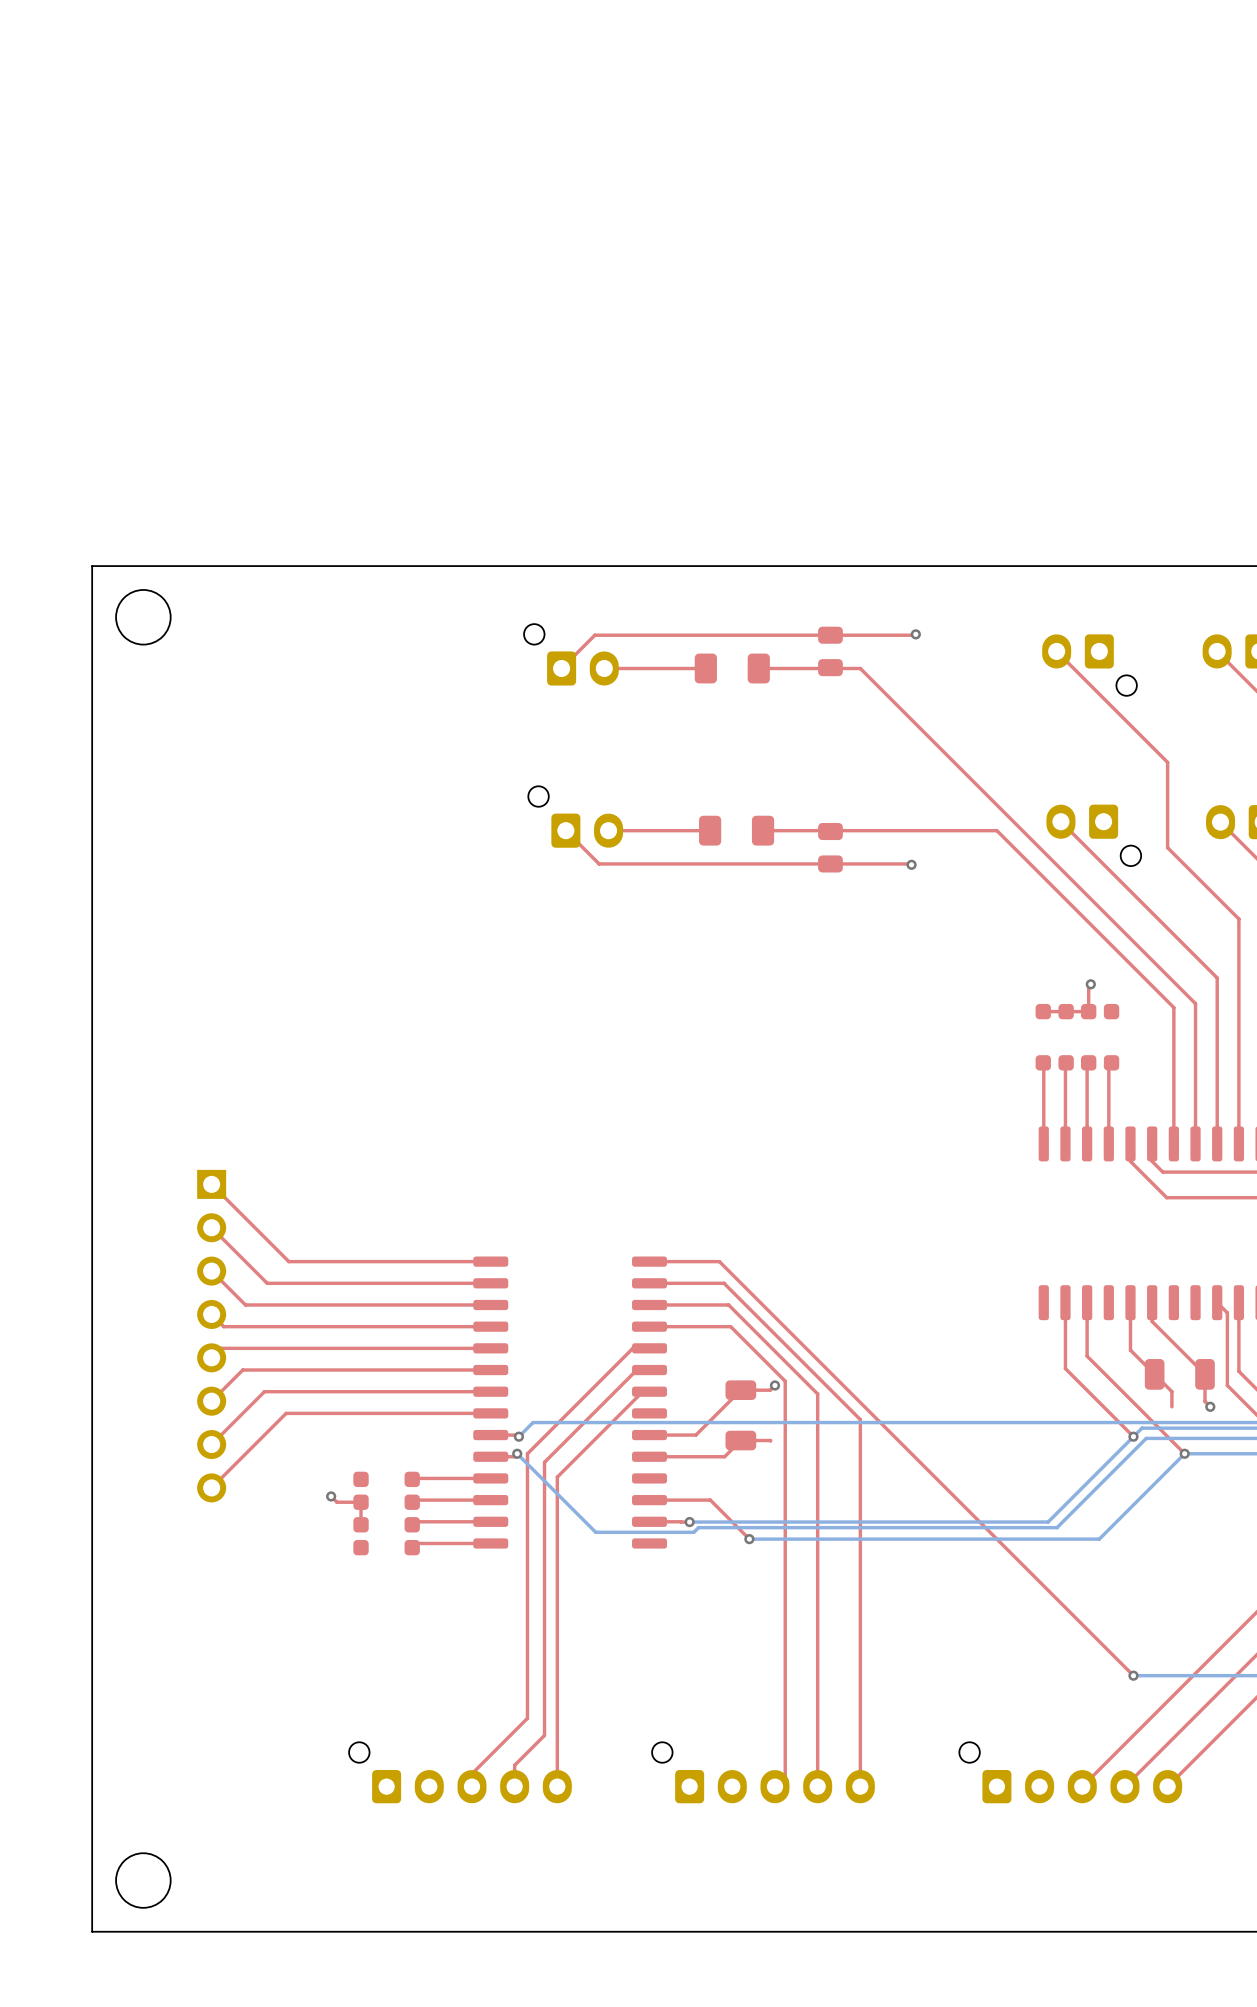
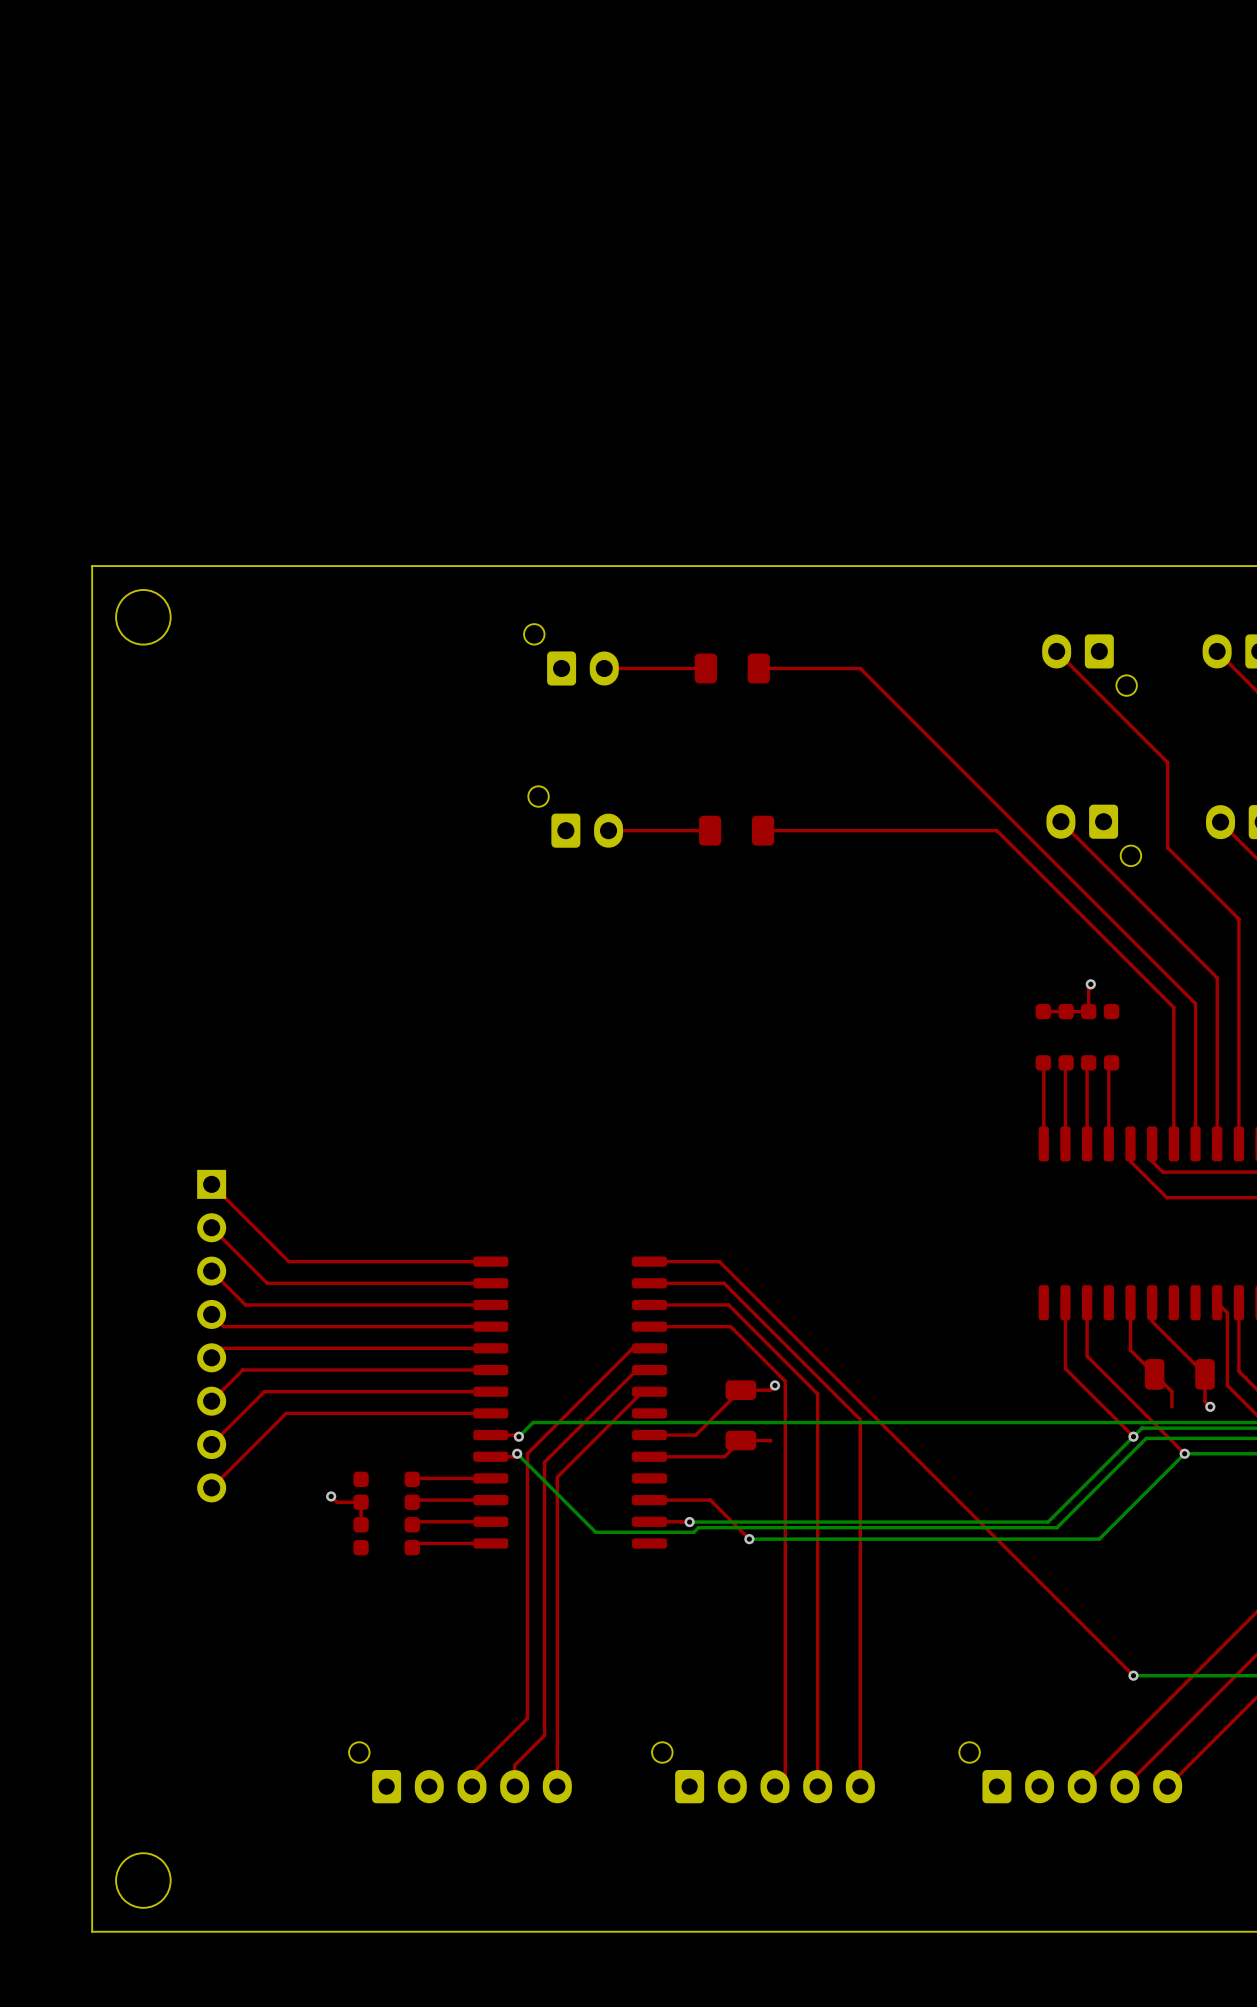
top track: (915, 634) (594, 635) (561, 668) -> none
via: (915, 634) -> none
part: (830, 651) -> none
top track: (565, 830) (599, 863) (911, 864) -> none
part: (830, 847) -> none
via: (911, 864) -> none

